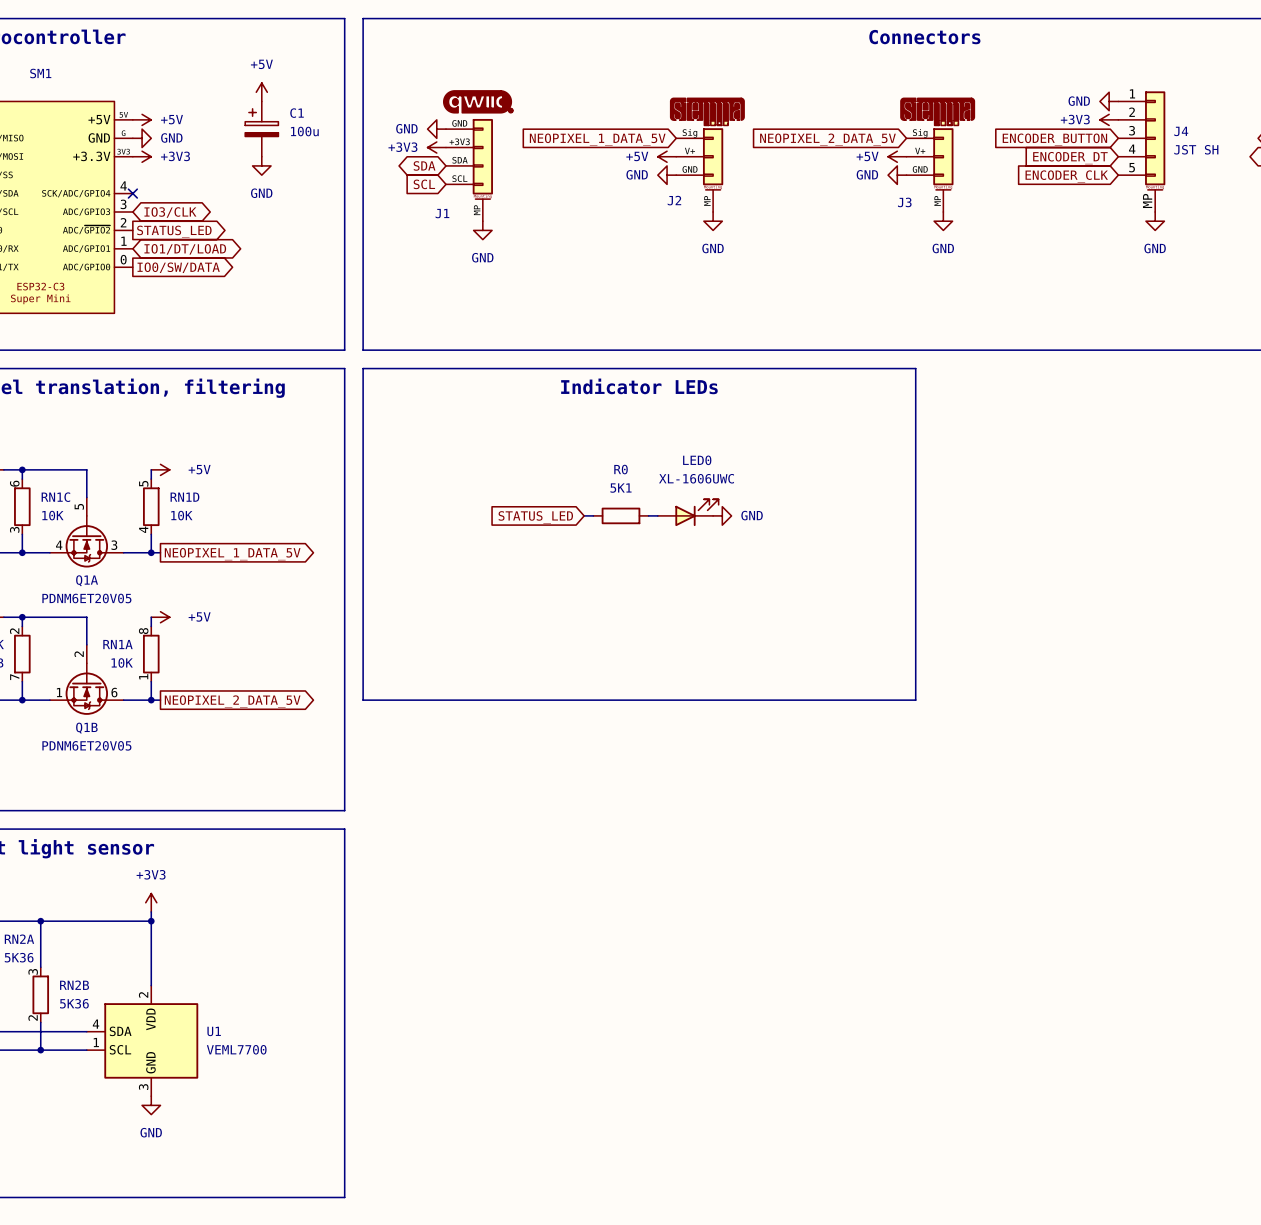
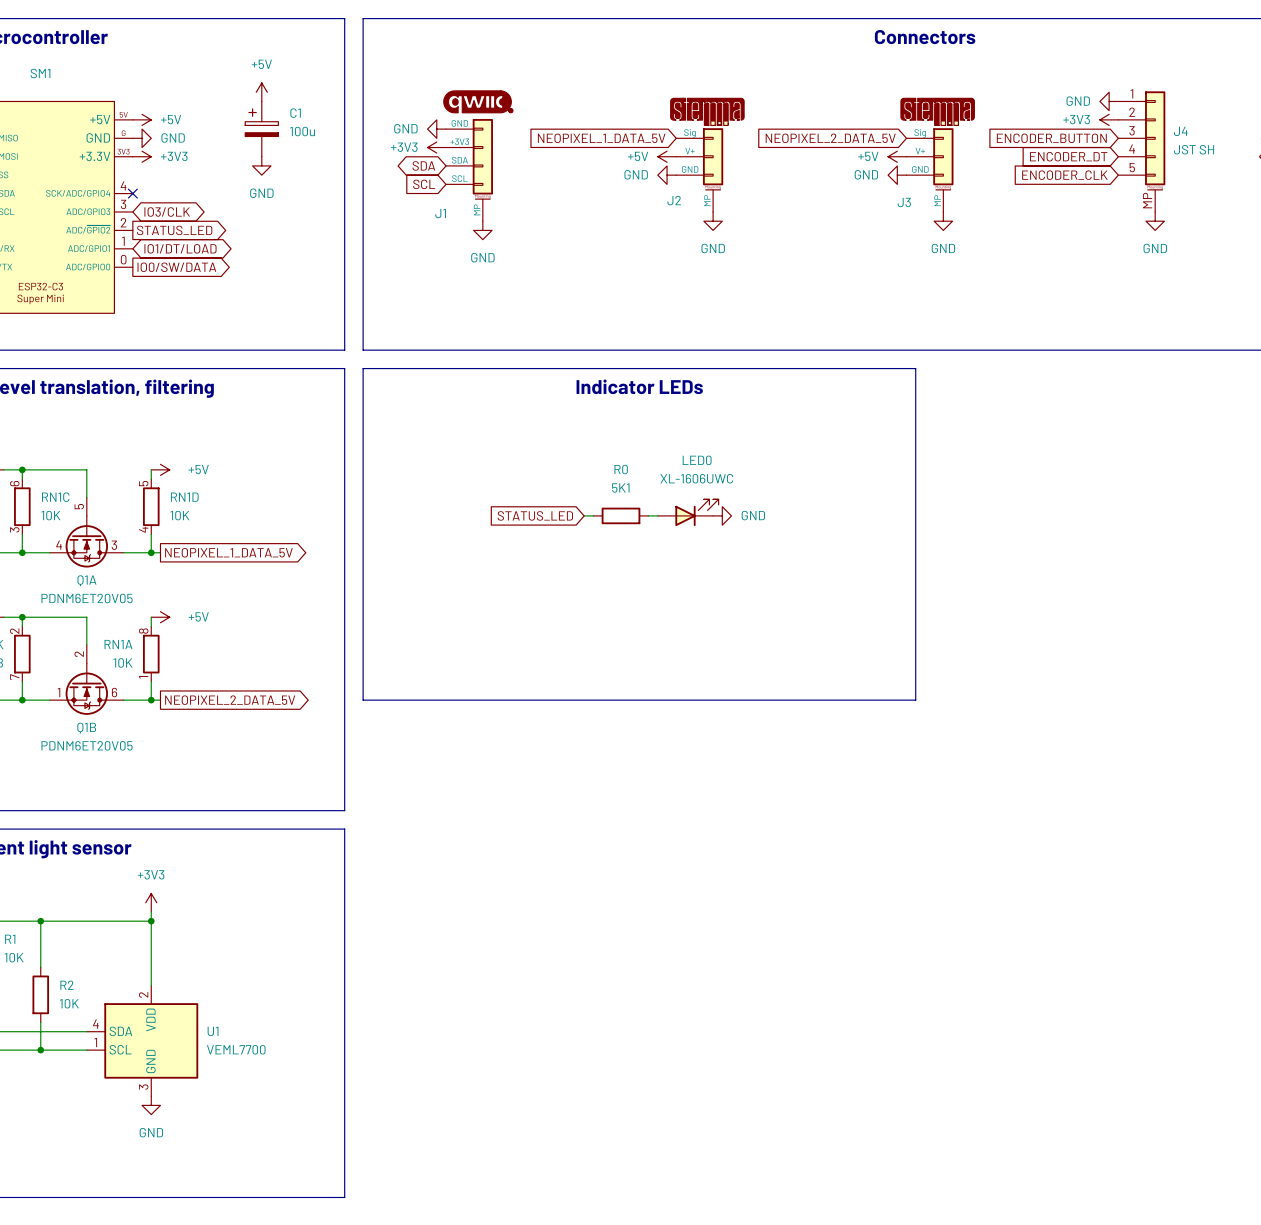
RN2A name: RN2A (19, 939) -> R1 (10, 939)
RN2A value: 5K36 (19, 957) -> 10K (14, 957)
RN2B pin number: 3 (33, 971) -> none
RN2B name: RN2B (74, 985) -> R2 (66, 985)
RN2B value: 5K36 (74, 1003) -> 10K (69, 1003)
RN2B pin number: 2 (33, 1017) -> none

